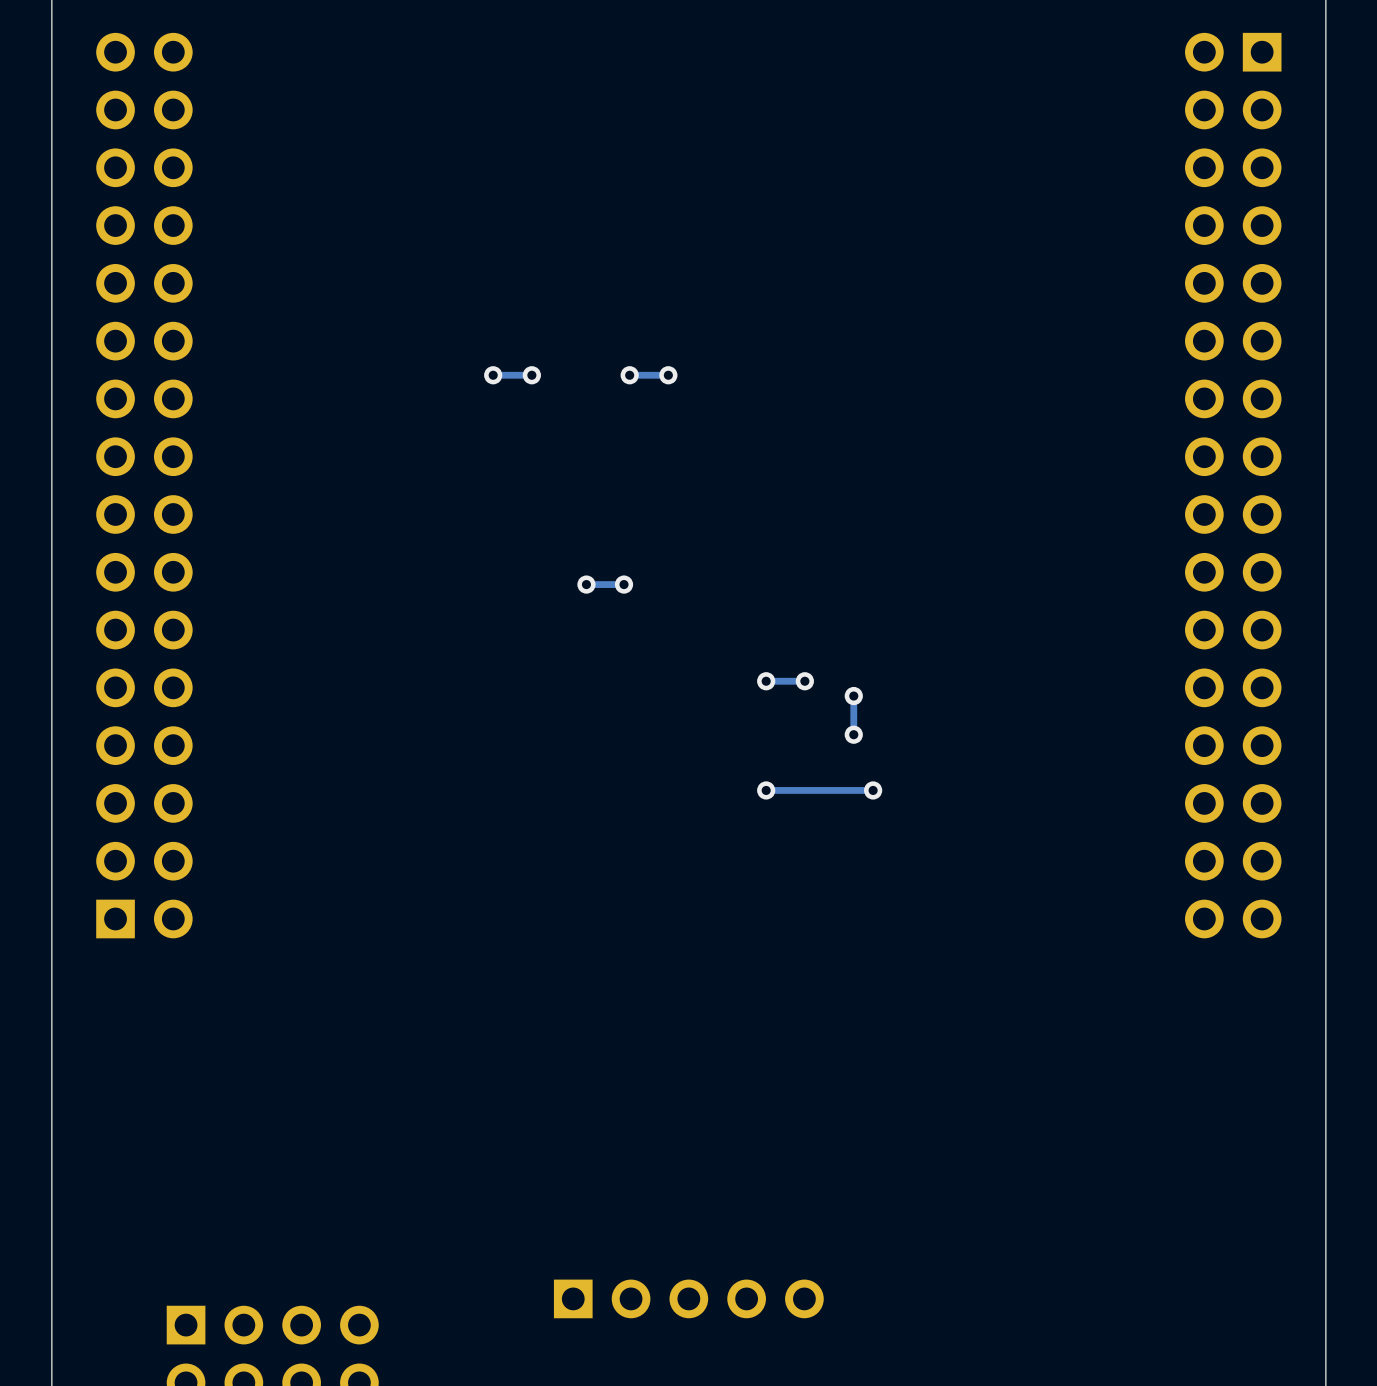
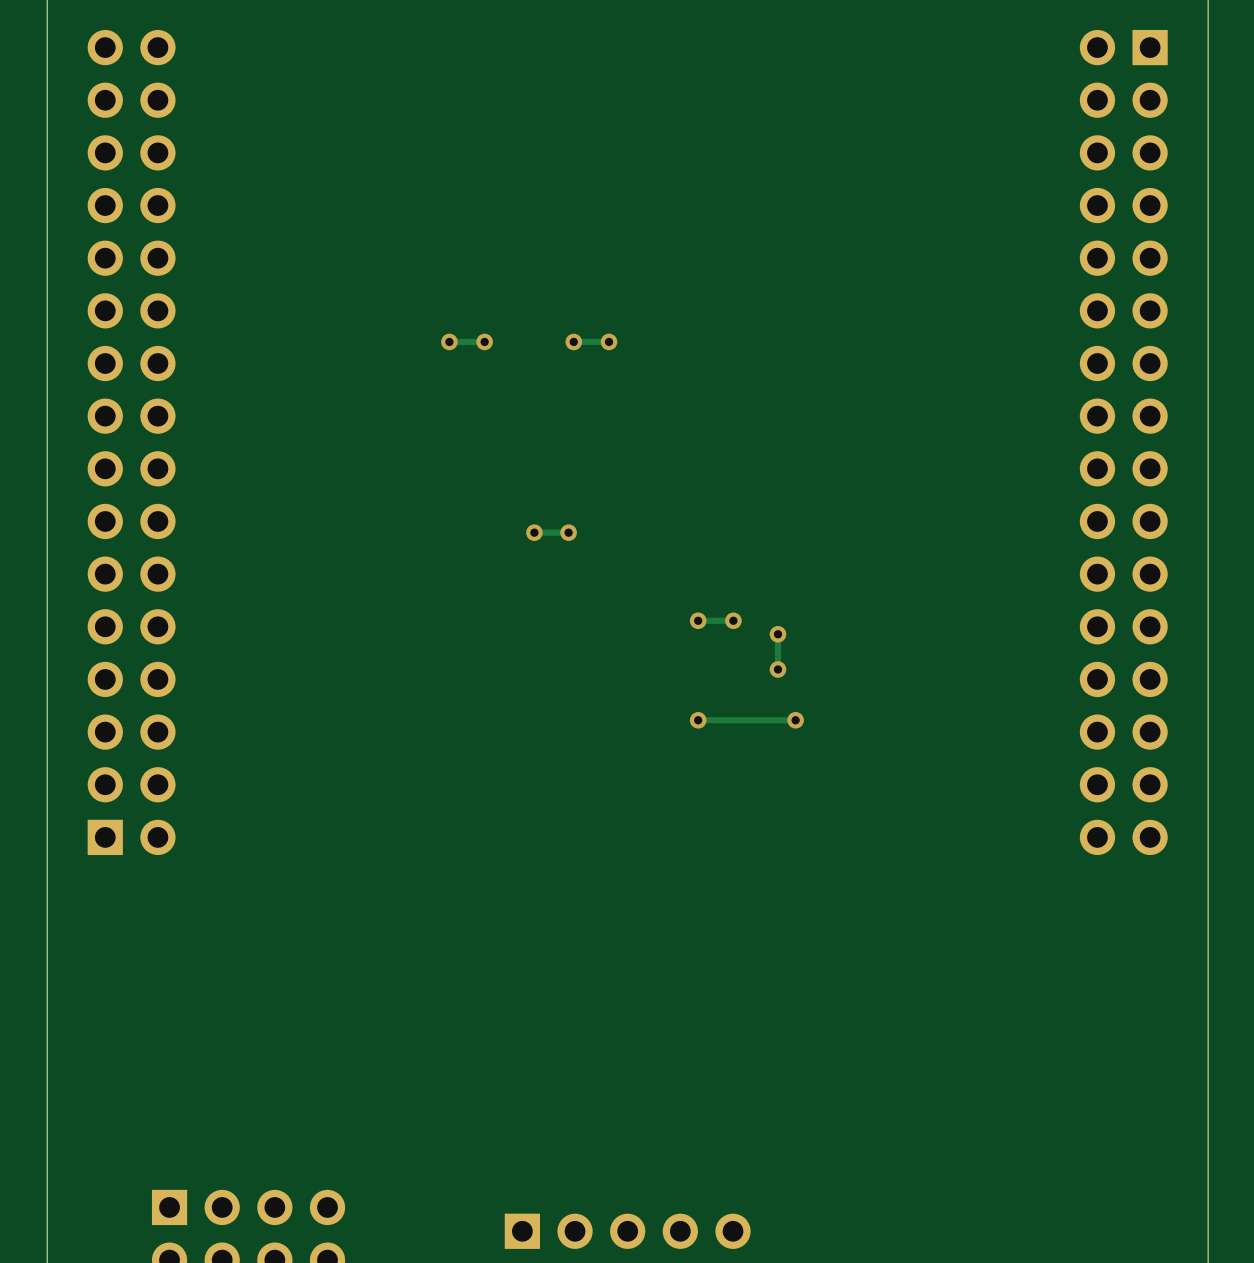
part position: (688, 1298) -> (627, 1231)

